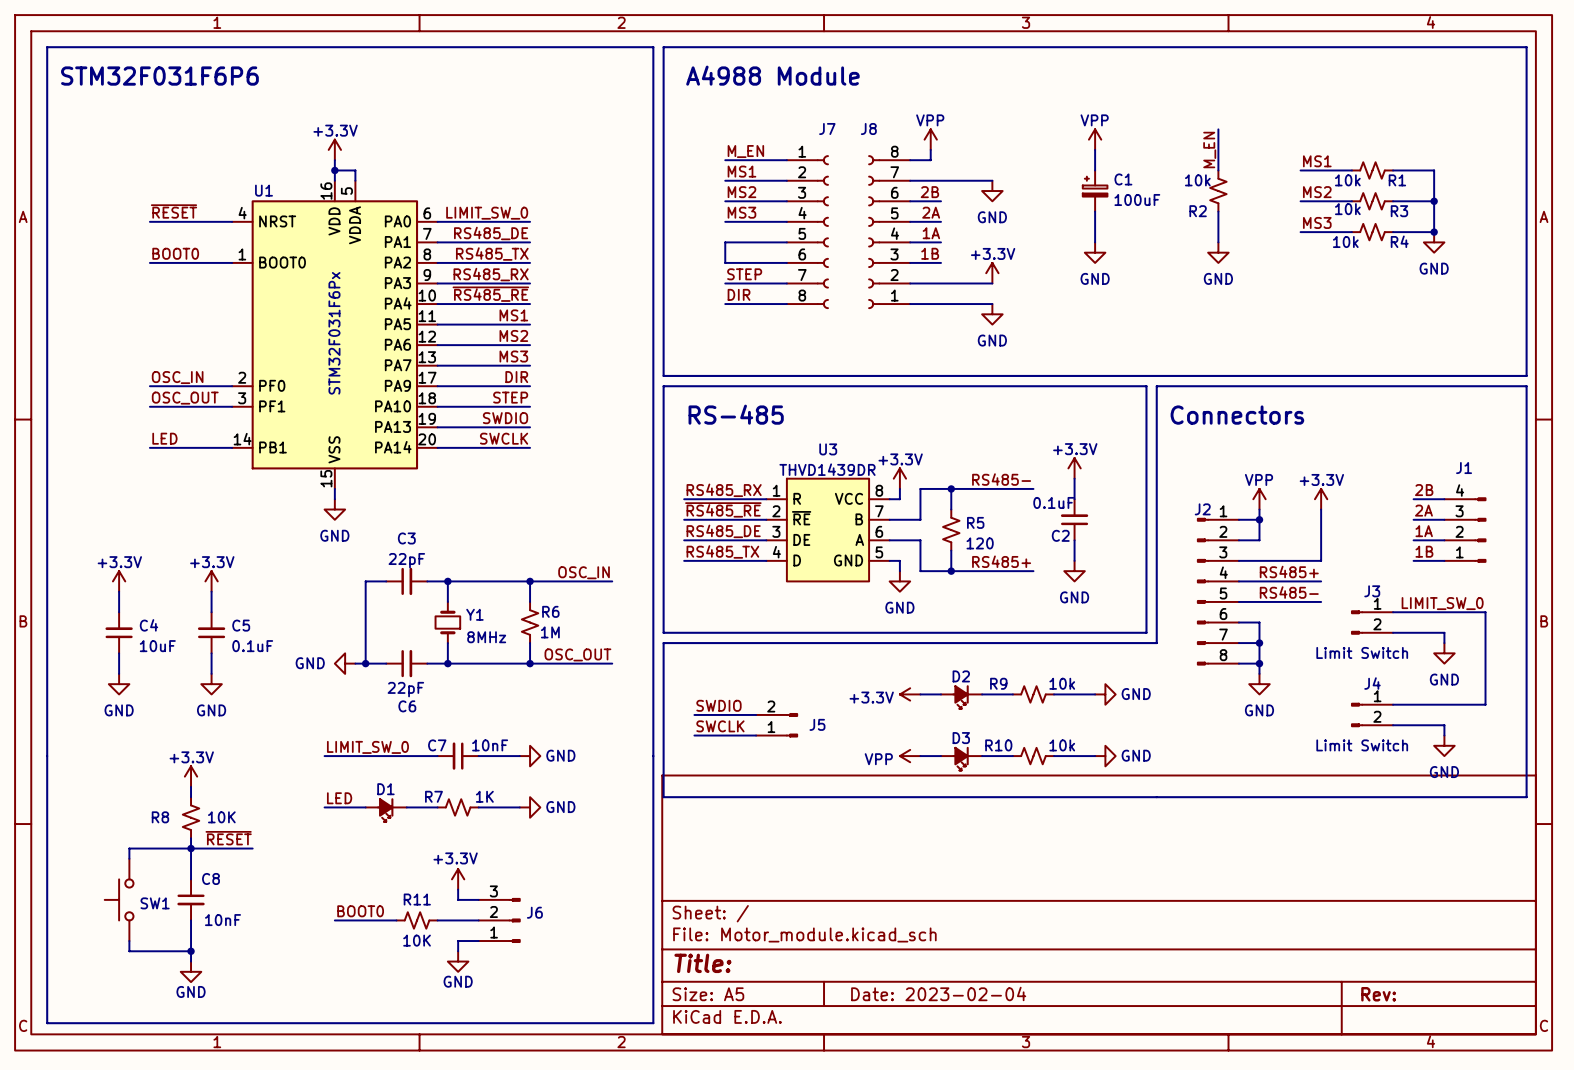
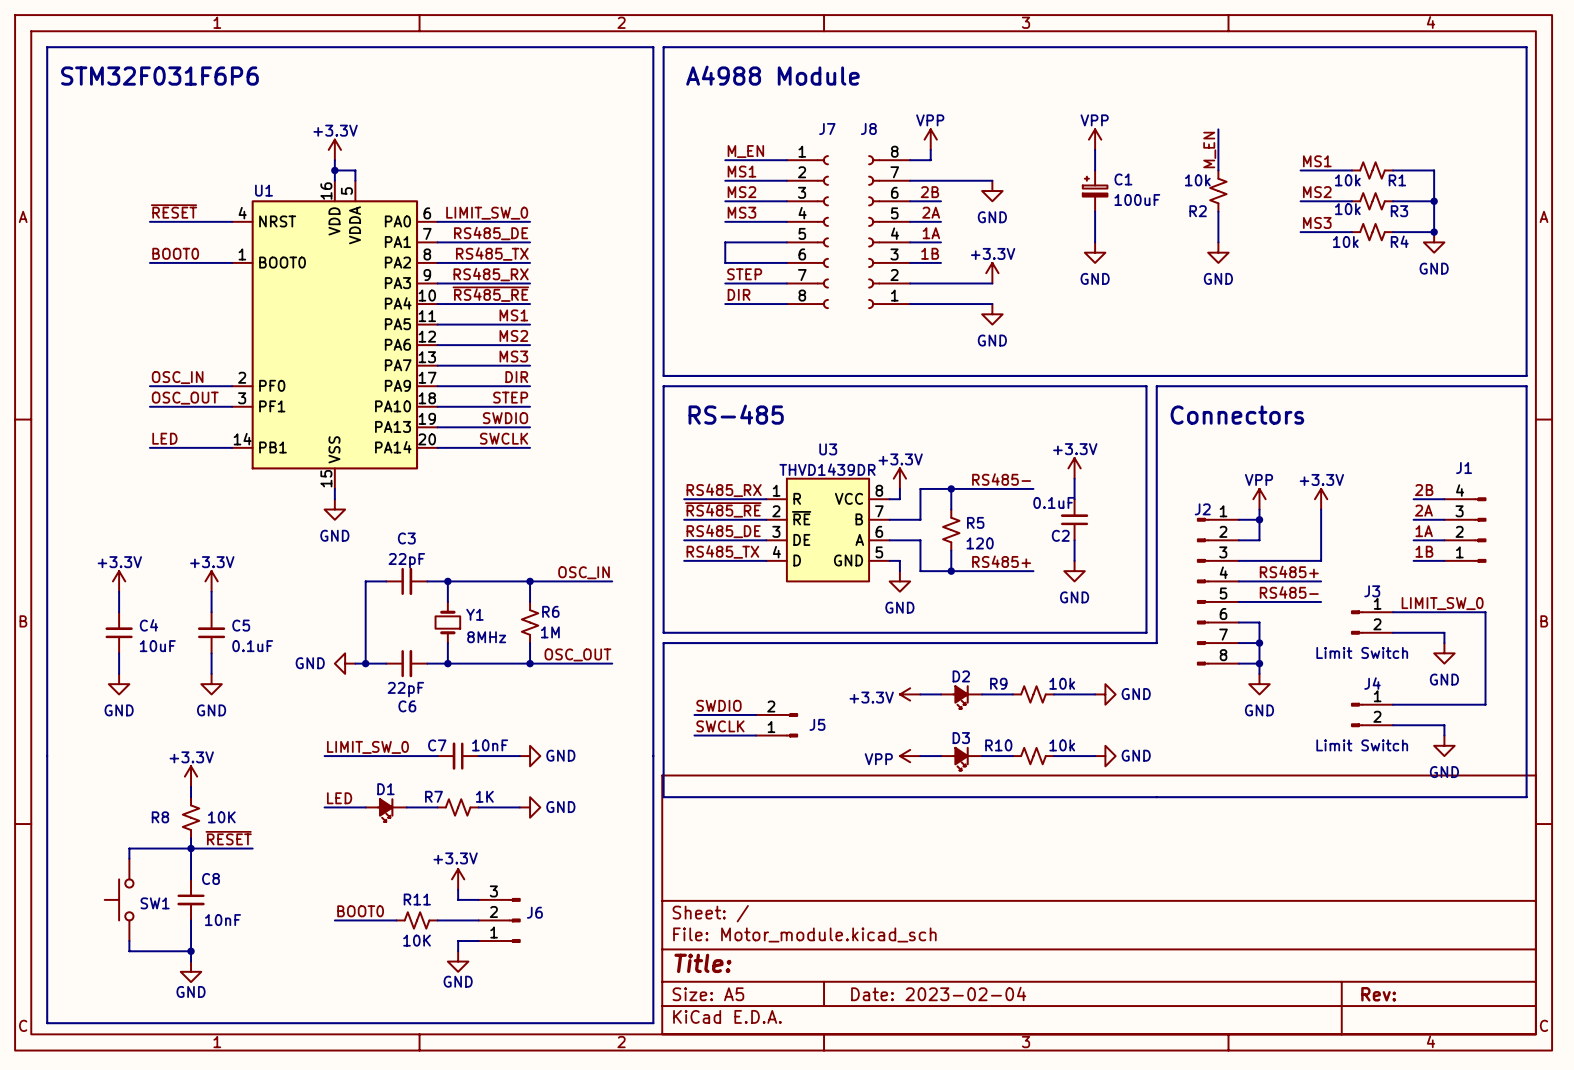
U1 value: STM32F031F6Px (334, 333) -> none

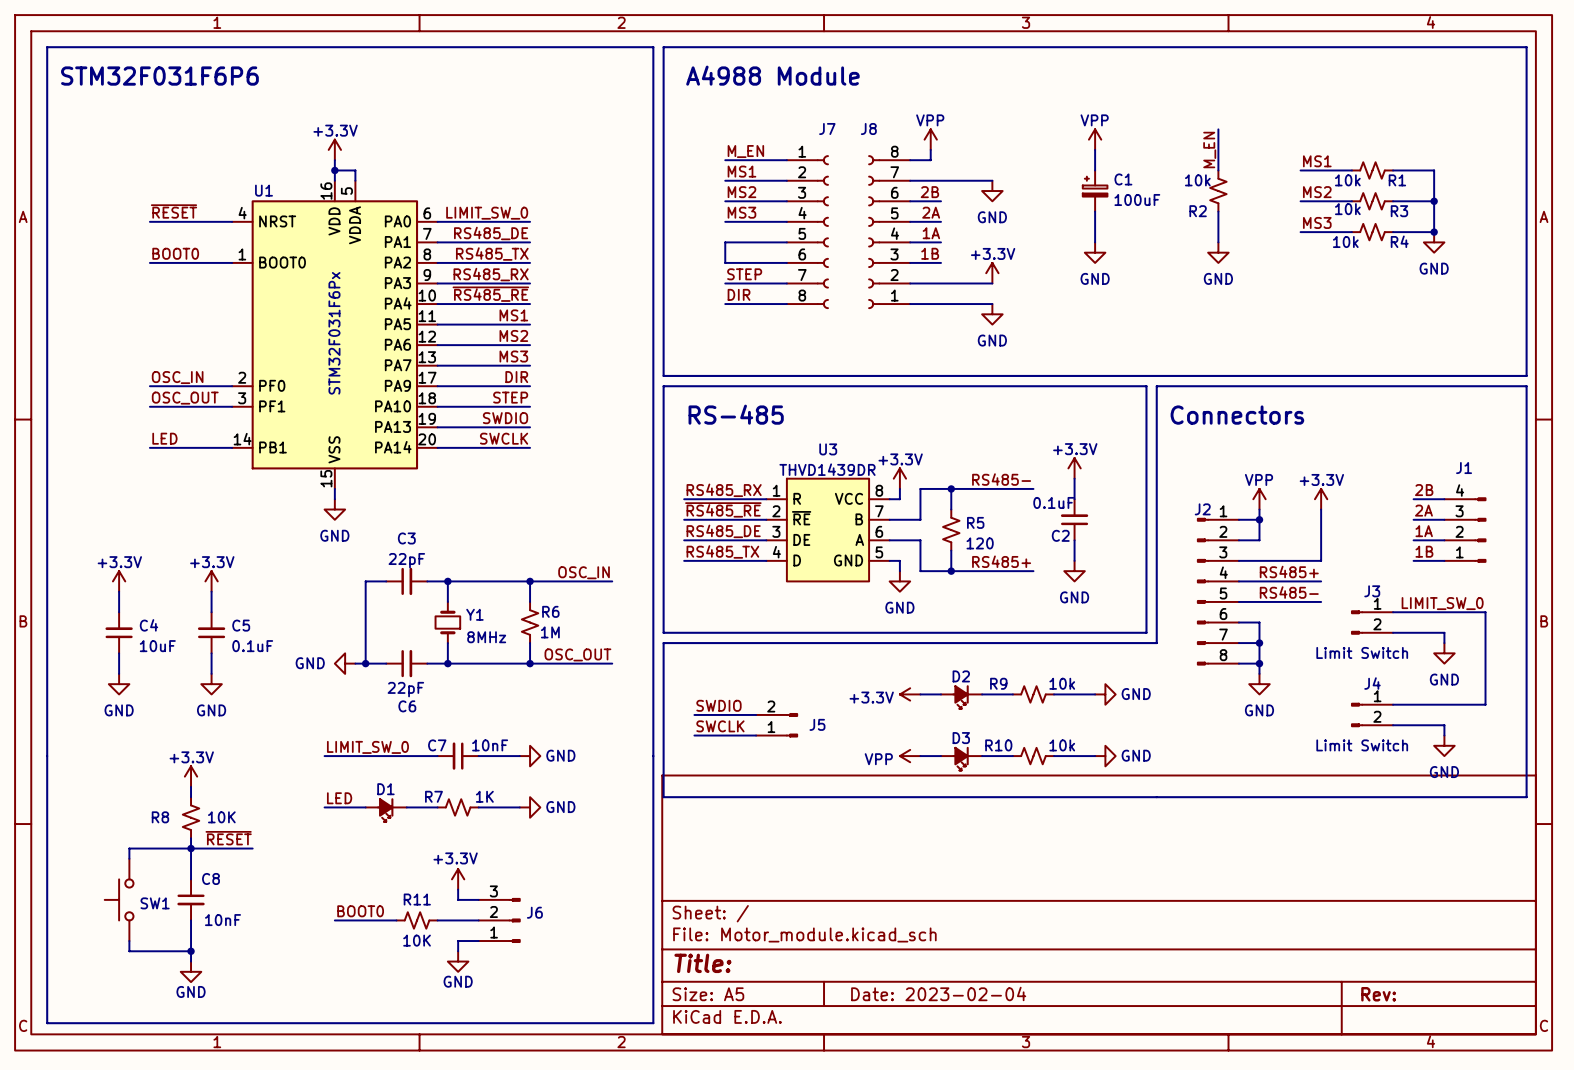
U1 value: none -> STM32F031F6Px (334, 333)

